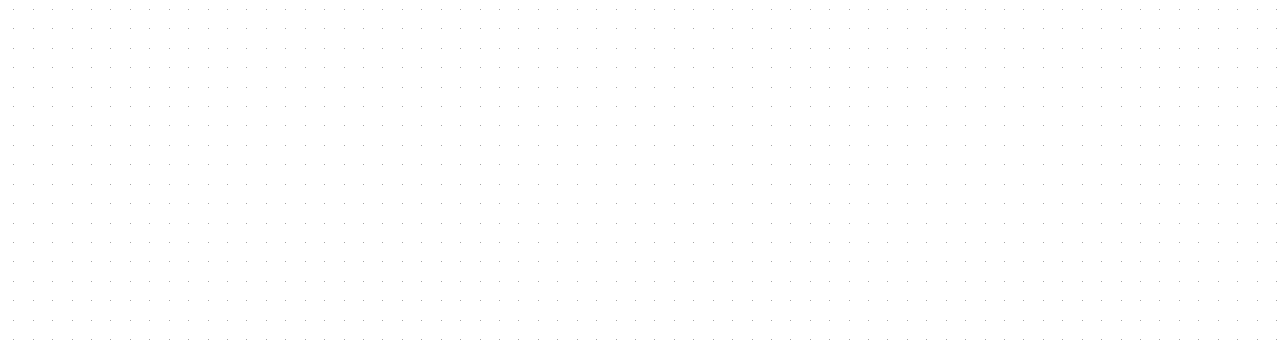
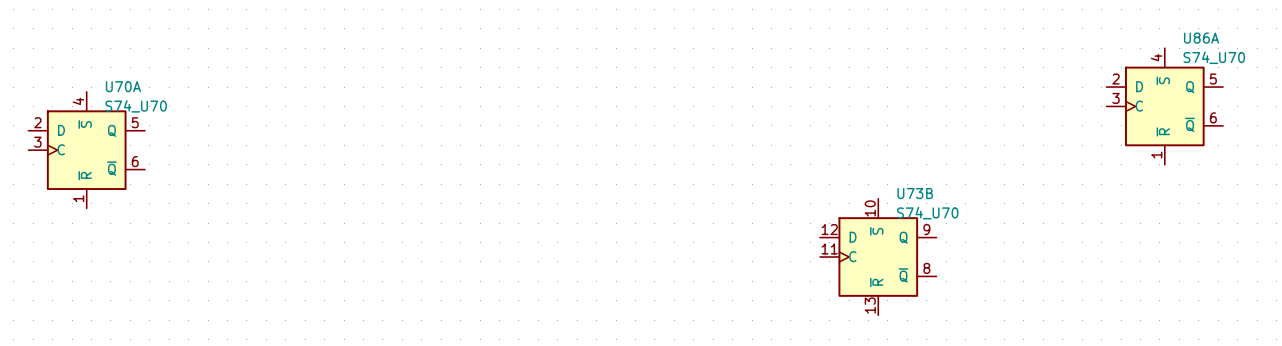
U86A: none -> S74_U70 (1164, 106)
U70A: none -> S74_U70 (86, 150)
U73B: none -> S74_U70 (878, 257)

